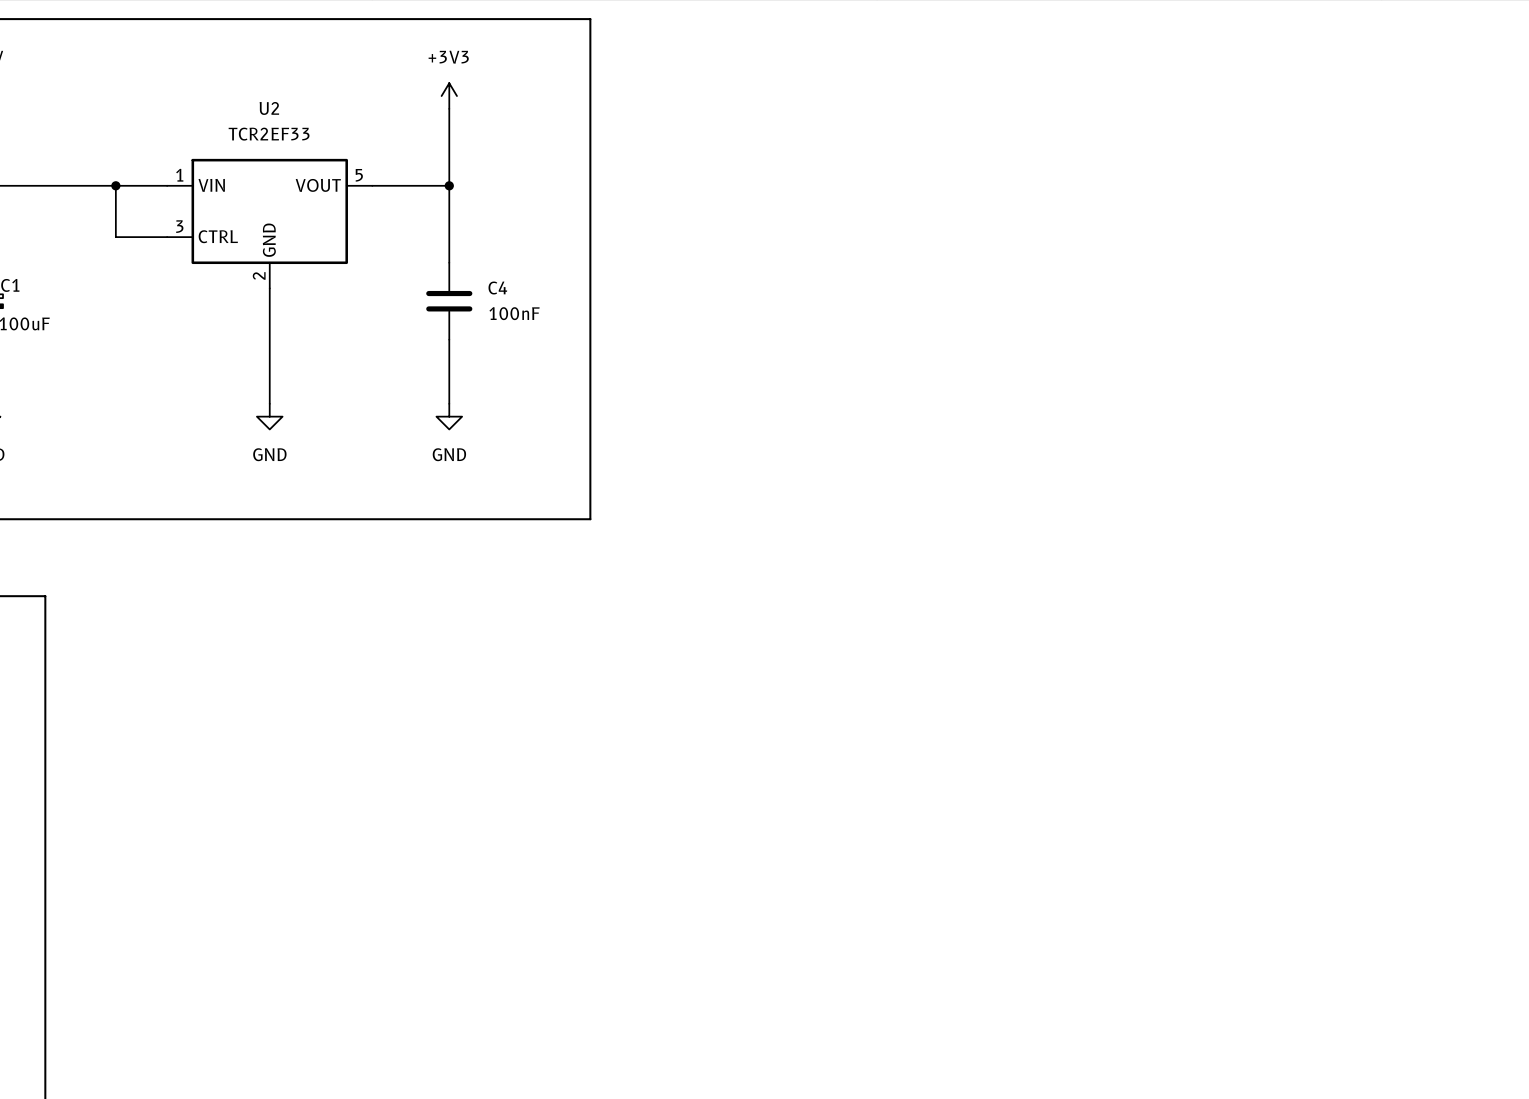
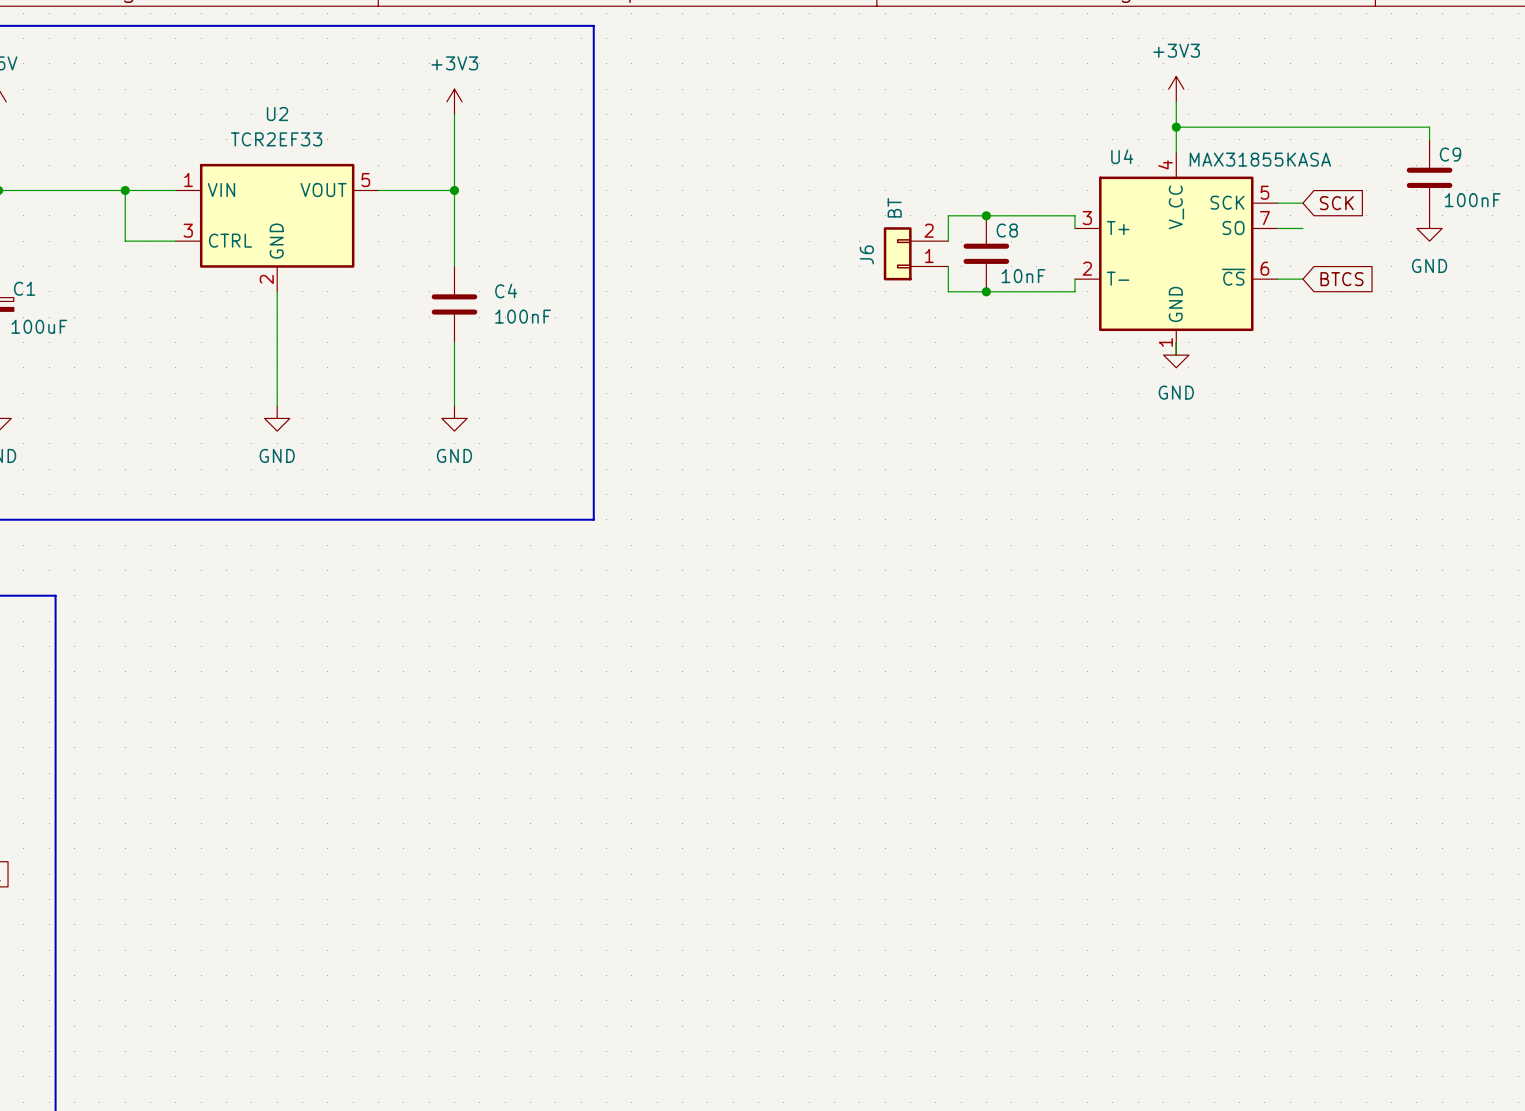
power symbol: none -> +3V3 (1176, 89)
wire: none -> (1176, 101) (1176, 152)
wire: none -> (1176, 127) (1429, 127) (1429, 139)
junction: none -> (1176, 127)
C9: none -> 100nF (1429, 177)
wire: none -> (1277, 203) (1302, 203)
global label: none -> SCK (1336, 203)
junction: none -> (986, 215)
wire: none -> (1074, 228) (1074, 215) (948, 215) (948, 241)
wire: none -> (1277, 228) (1302, 228)
power symbol: none -> GND (1429, 228)
J6: none -> BT (916, 253)
C8: none -> 10nF (986, 253)
U4: none -> MAX31855KASA (1176, 253)
wire: none -> (948, 266) (948, 291) (1074, 291) (1074, 279)
wire: none -> (1277, 279) (1302, 279)
global label: none -> BTCS (1341, 279)
junction: none -> (986, 291)
wire: none -> (1176, 342) (1176, 355)
power symbol: none -> GND (1176, 355)

